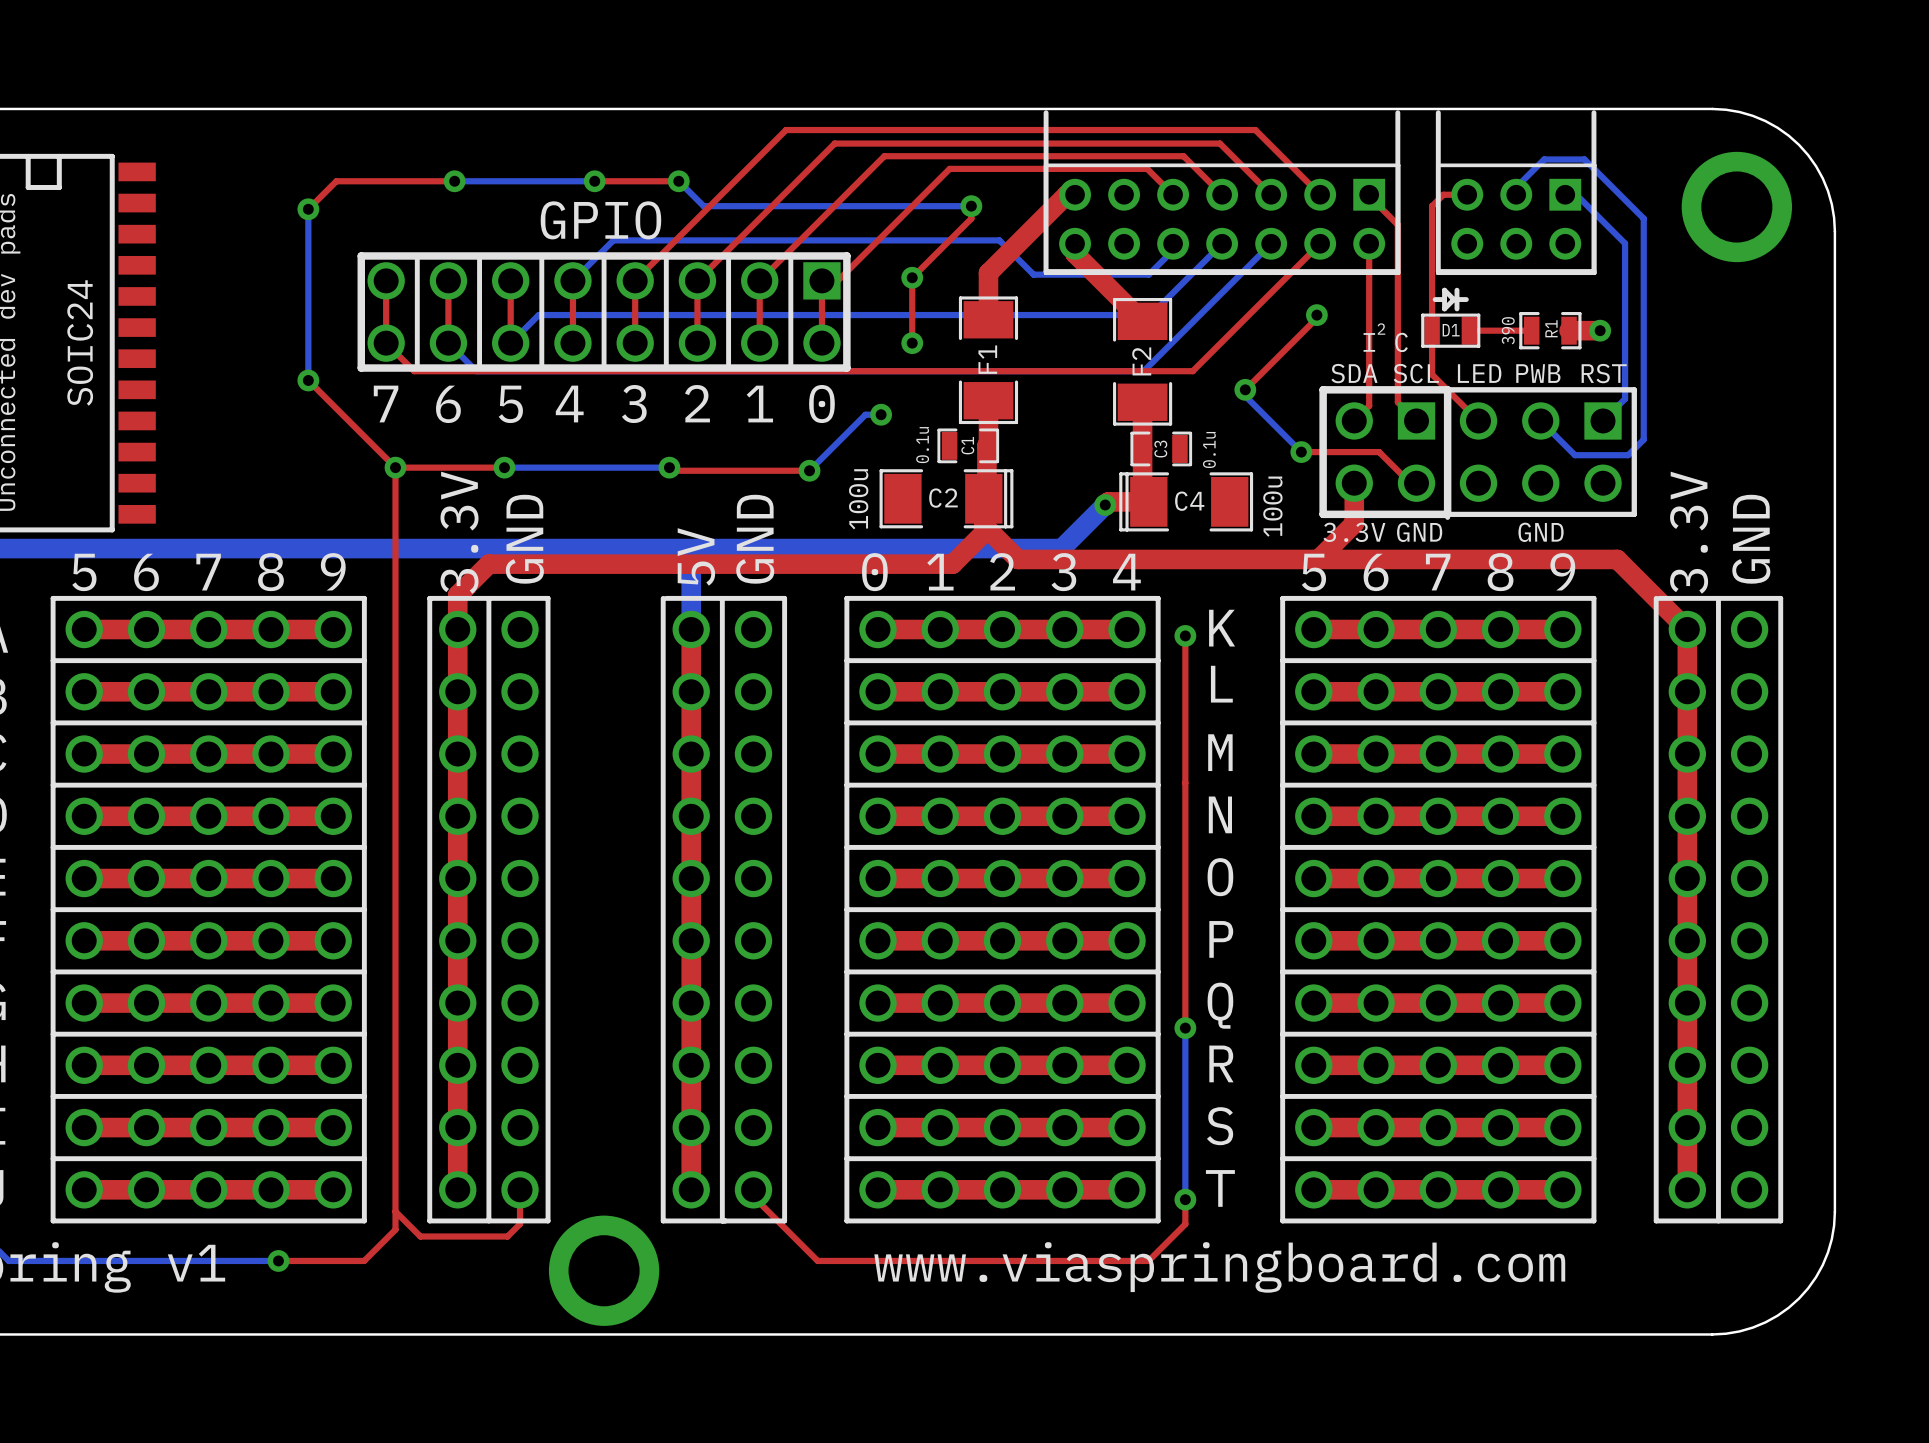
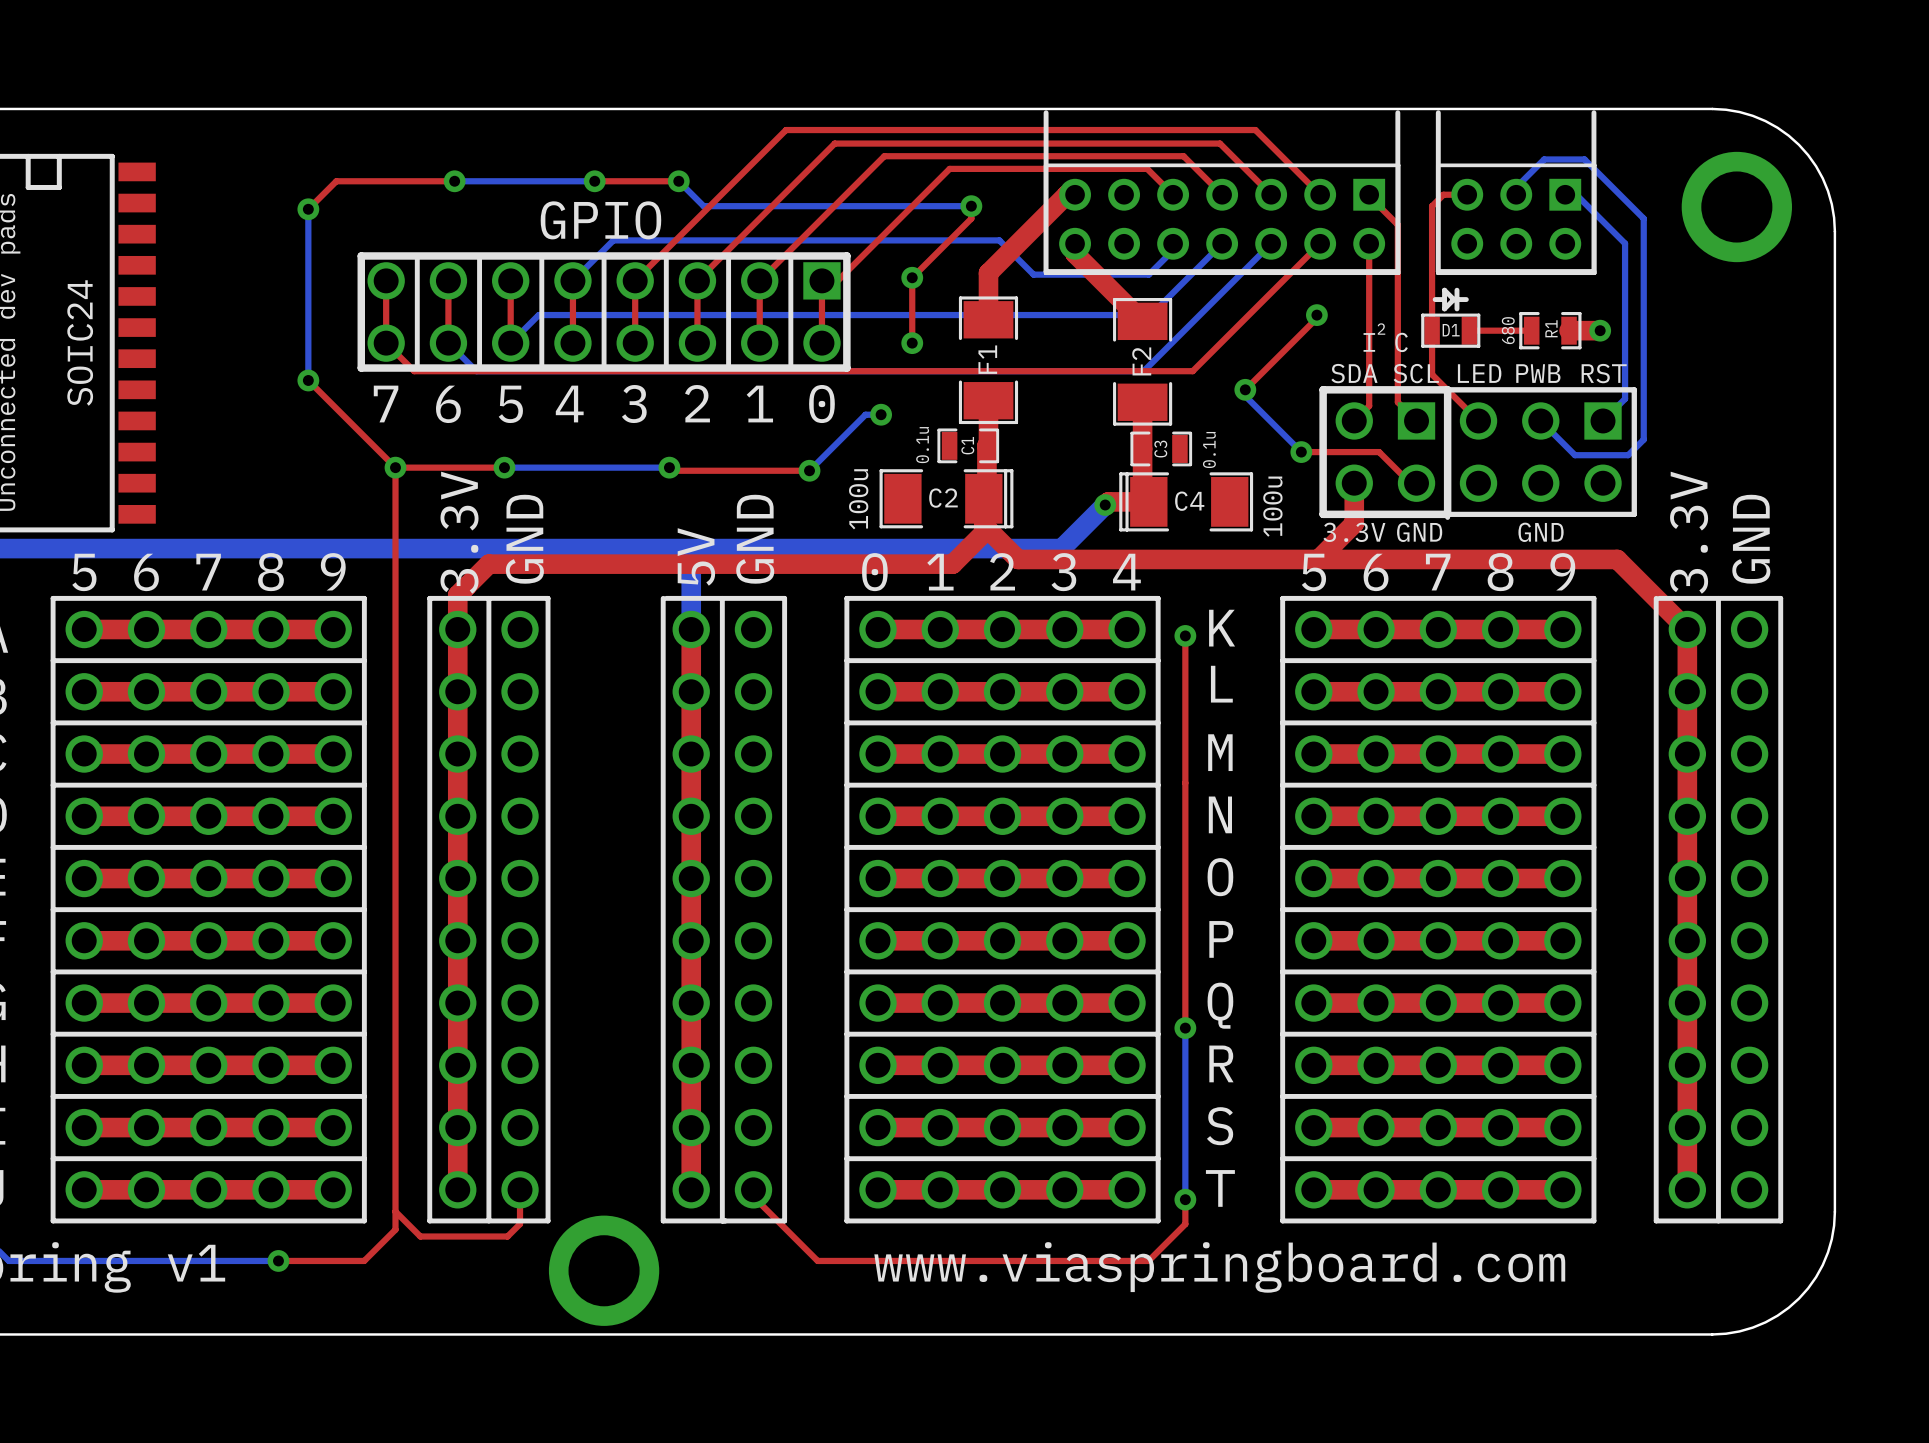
R1 value: 390 (1508, 330) -> 680 (1508, 330)

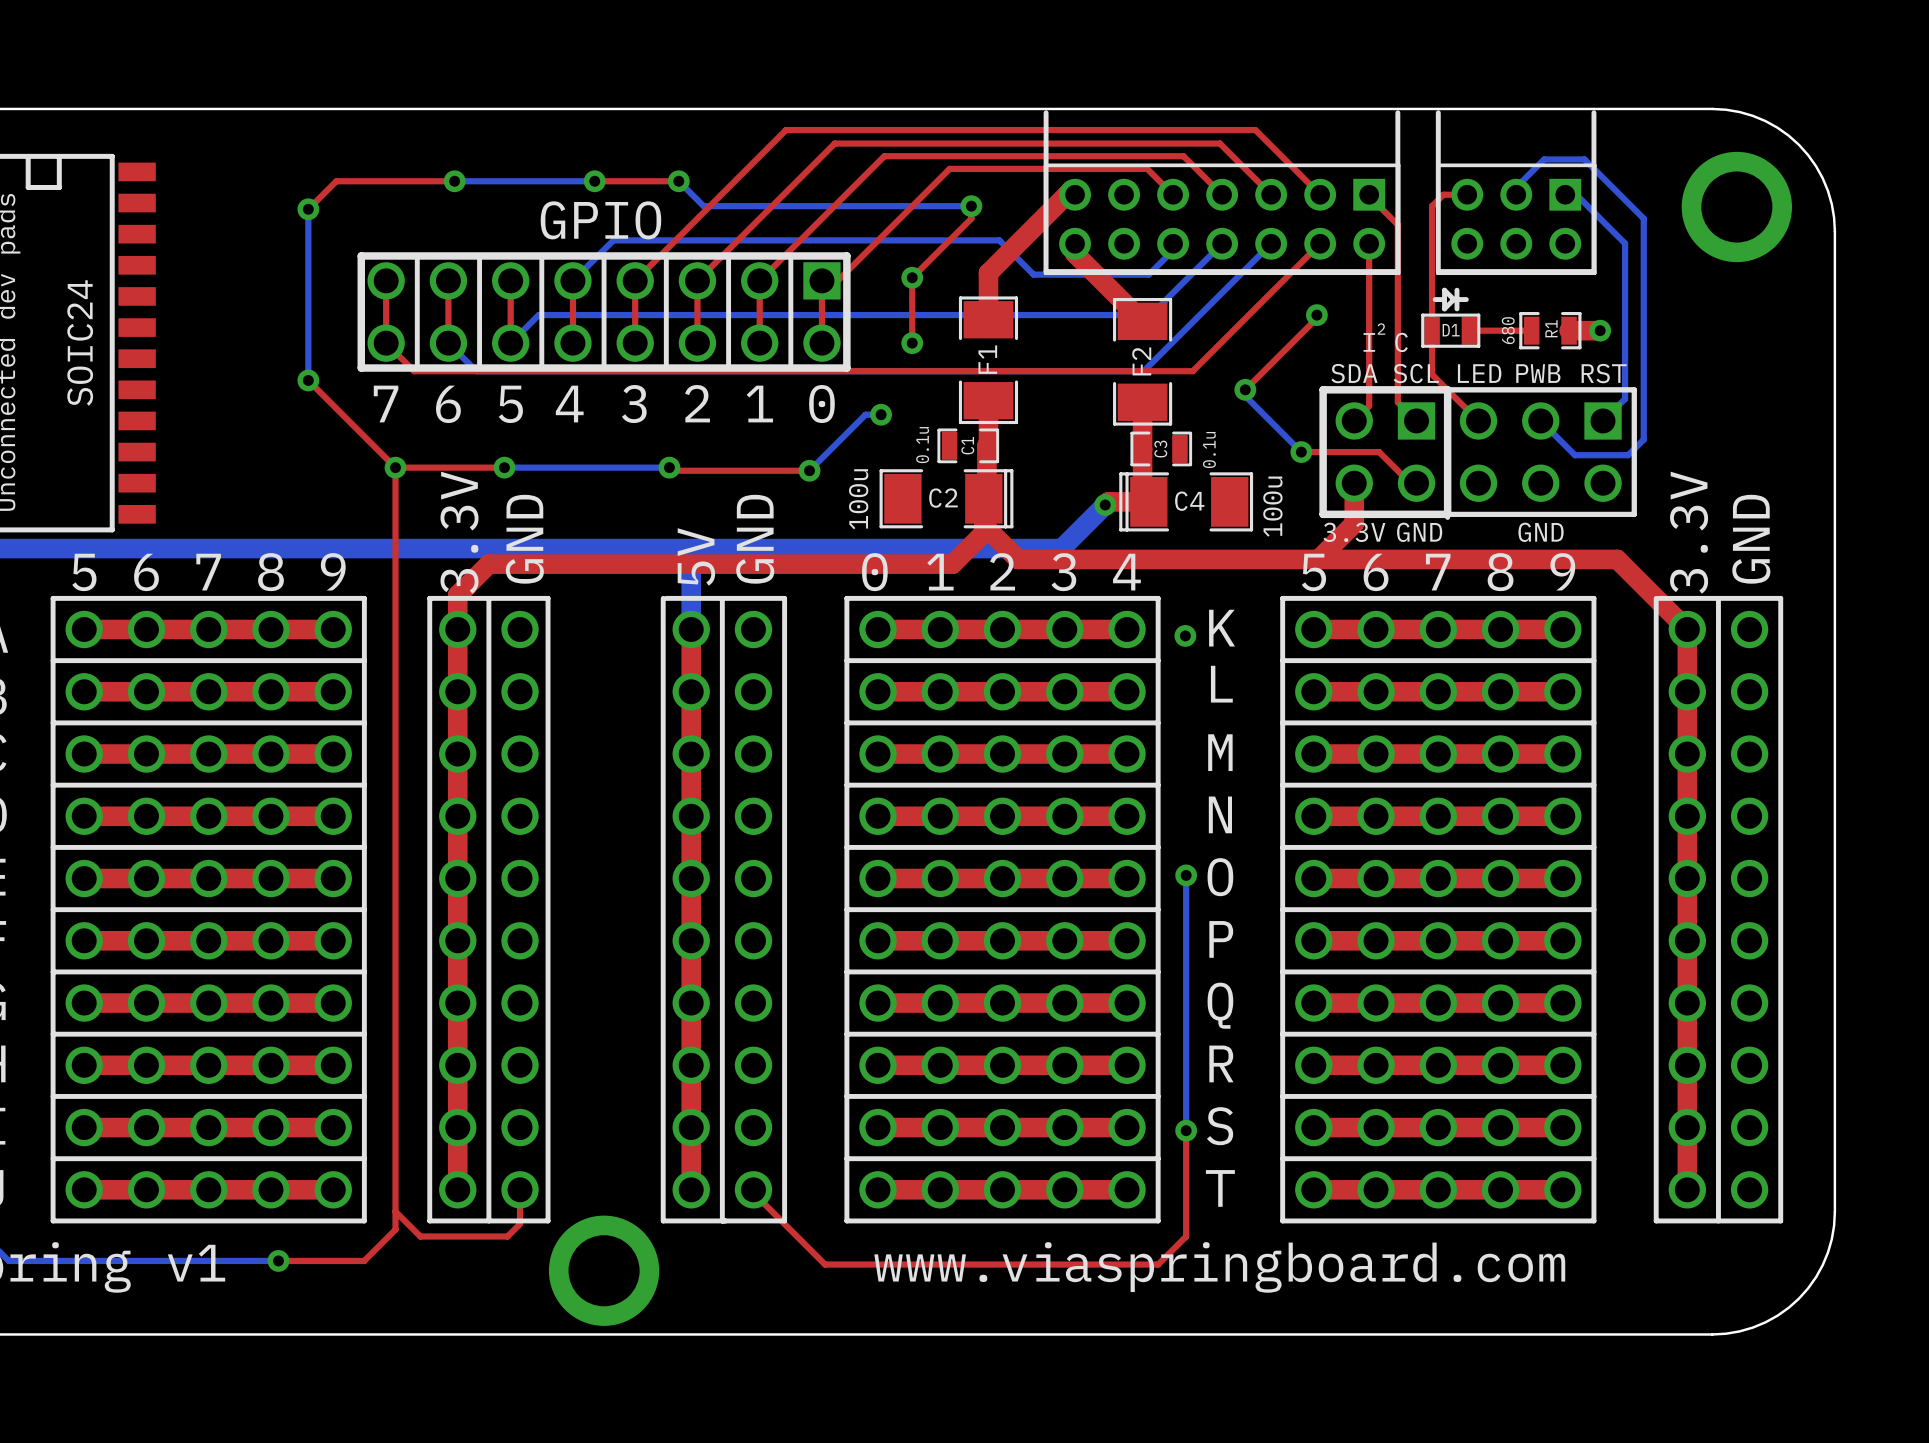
top track: (1185, 635) (1185, 1028) -> none
bottom track: none -> (1186, 875) (1186, 1130)
via: none -> (1186, 875)
bottom track: (1185, 1028) (1185, 1199) -> none
via: (1185, 1028) -> none
via: none -> (1186, 1130)
top track: (753, 1192) (753, 1196) (817, 1260) (1148, 1260) (1185, 1224) (1185, 1199) -> (753, 1192) (825, 1264) (1158, 1264) (1186, 1236) (1186, 1130)
via: (1185, 1199) -> none

